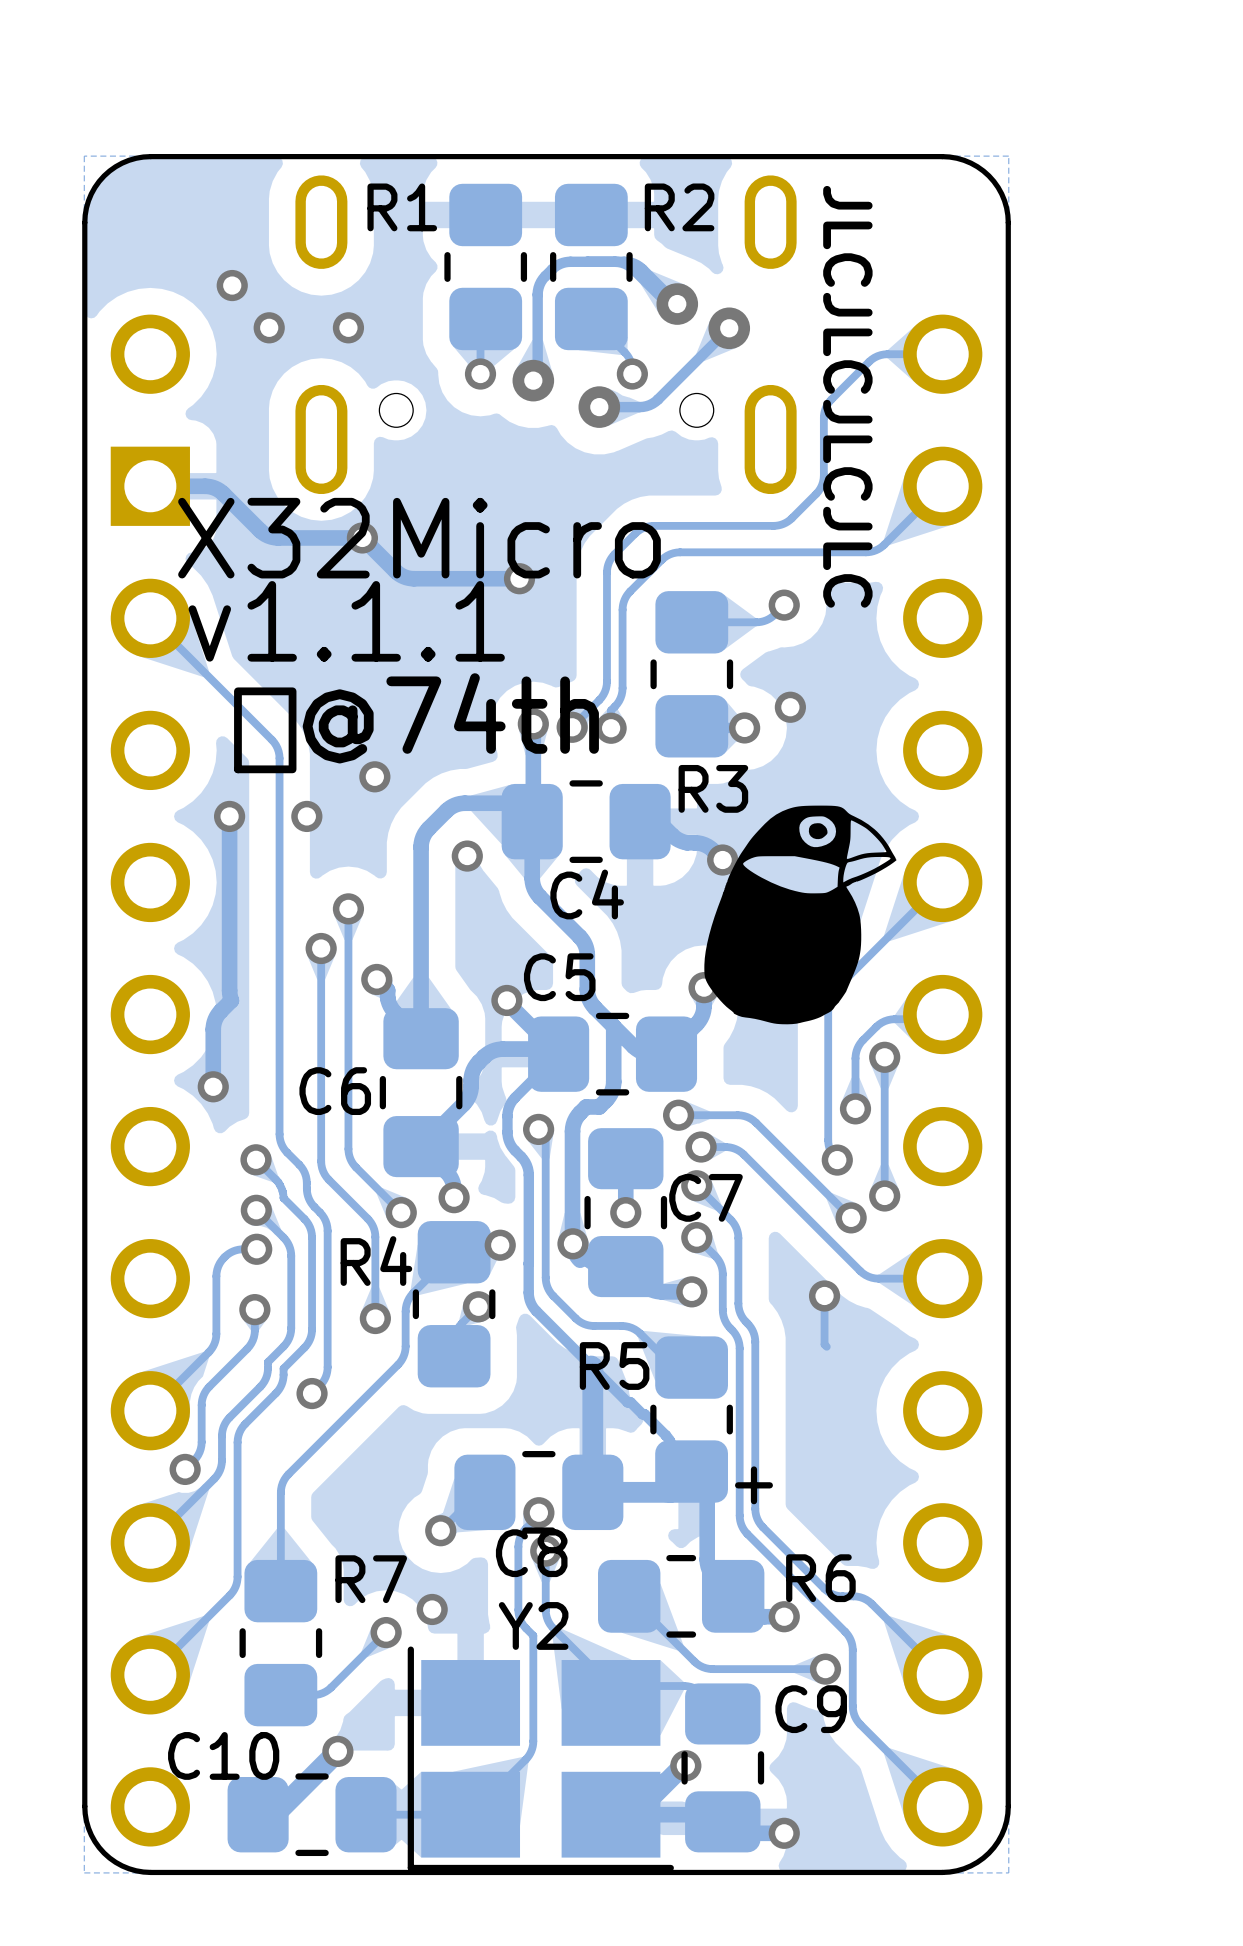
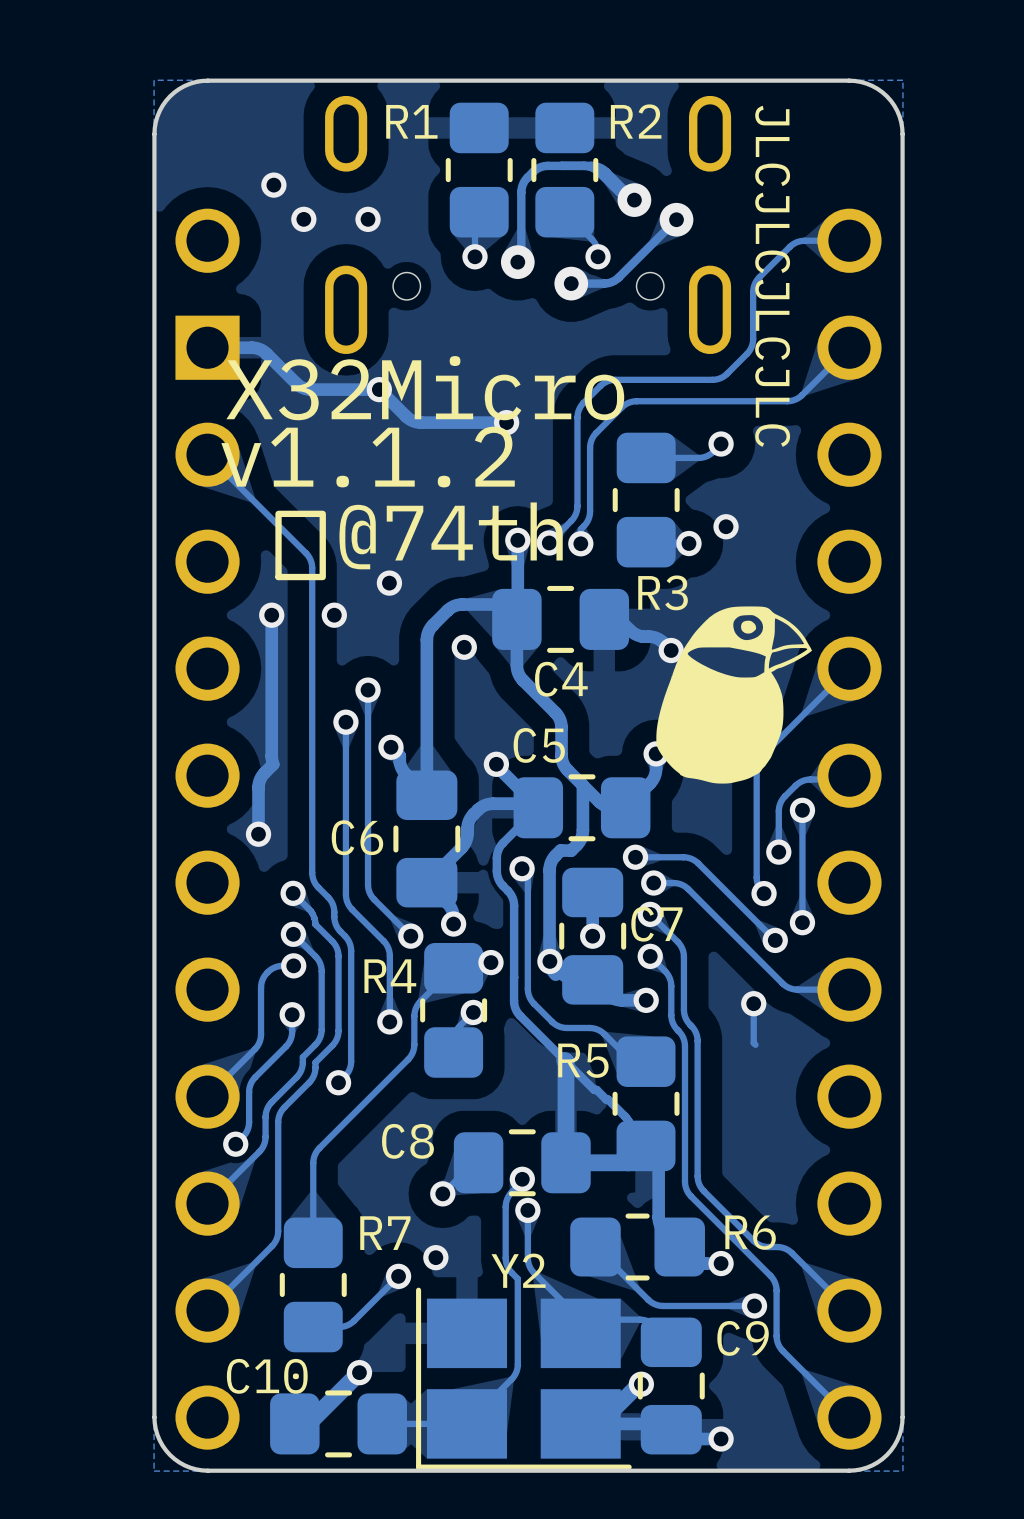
text: v1.1.1 (346, 621) -> v1.1.2 (368, 457)
text: + (753, 1485) -> none
C8 name position: C8 (531, 1553) -> C8 (407, 1141)

